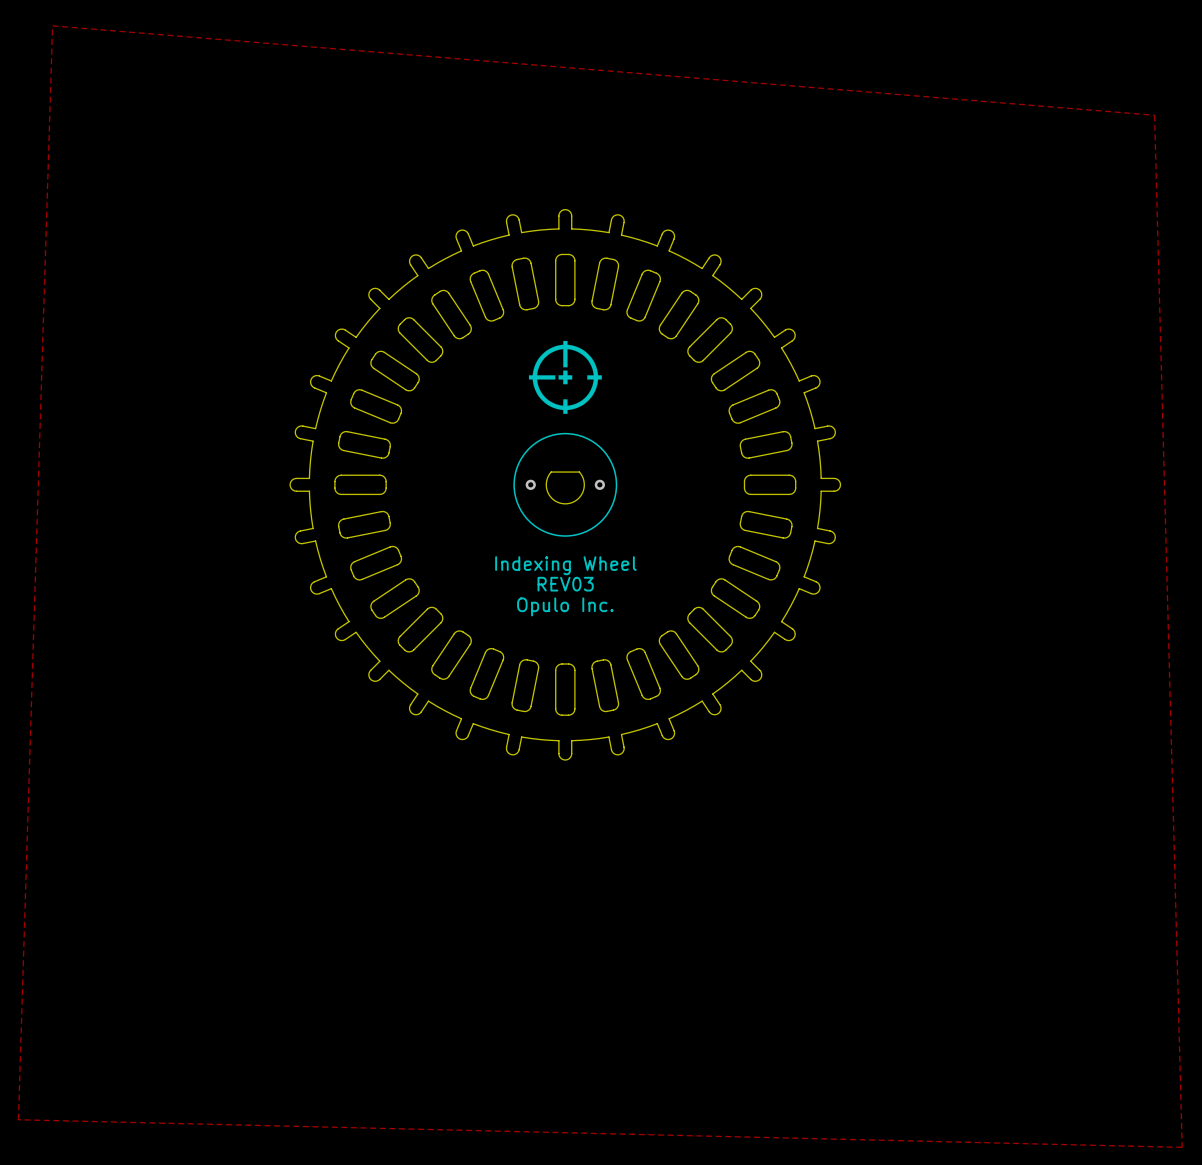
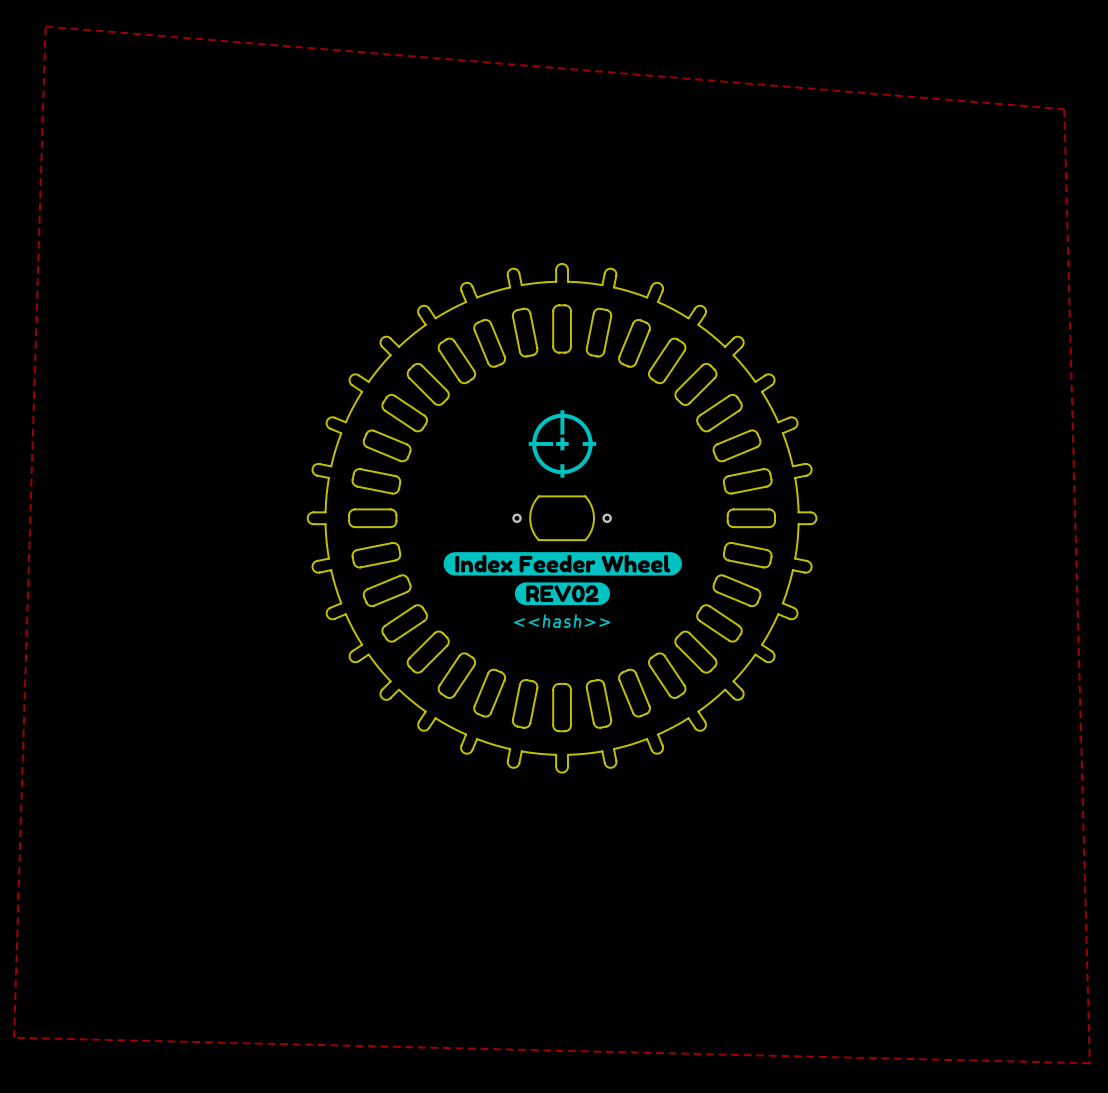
board edge: (562, 254) (570, 254) (574, 260) (574, 299) (569, 305) (559, 305) (555, 300) (555, 260) (557, 256) (562, 254) -> (559, 305) (567, 305) (570, 310) (570, 347) (565, 352) (556, 352) (553, 347) (553, 310) (559, 305)
board edge: (523, 258) (514, 260) (512, 266) (519, 305) (526, 309) (536, 307) (538, 301) (530, 262) (527, 258) (523, 258) -> (523, 308) (515, 311) (512, 316) (520, 352) (526, 356) (535, 354) (537, 348) (530, 312) (523, 308)
board edge: (613, 259) (617, 261) (618, 266) (610, 304) -> none
board edge: (613, 259) (604, 258) (600, 261) (591, 301) (594, 307) (603, 309) (608, 308) (610, 304) -> none
board edge: (480, 270) (471, 274) (470, 280) (485, 317) (493, 320) (502, 316) (503, 310) (488, 273) (485, 270) (480, 270) -> (483, 320) (475, 324) (474, 329) (488, 363) (495, 366) (503, 362) (504, 357) (490, 323) (483, 320)
board edge: (650, 270) (658, 274) (660, 280) (644, 317) (637, 320) (628, 316) (627, 310) (642, 273) (646, 270) (650, 270) -> (640, 320) (648, 324) (649, 329) (635, 363) (628, 366) (620, 362) (619, 357) (633, 323) (640, 320)
board edge: (439, 291) (444, 290) (448, 292) (470, 325) (470, 332) (462, 337) (454, 336) (432, 303) (432, 296) (439, 291) -> (446, 339) (454, 340) (474, 371) (474, 377) (467, 382) (459, 381) (439, 350) (439, 344) (446, 339)
board edge: (690, 291) (697, 296) (698, 303) (675, 336) (668, 337) (660, 332) (660, 325) (682, 292) (686, 290) (690, 291) -> (677, 339) (684, 344) (684, 350) (664, 381) (657, 382) (649, 377) (649, 371) (670, 340) (677, 339)
board edge: (370, 299) (379, 308) (356, 337) (343, 329) (336, 332) (337, 339) (348, 347) (331, 380) (317, 375) (311, 379) (312, 386) (326, 392) (315, 428) (301, 426) (295, 431) (298, 438) (313, 441) (309, 478) (294, 478) (290, 484) (294, 491) (309, 491) (313, 528) (298, 531) (295, 538) (301, 543) (315, 541) (326, 576) (313, 582) (311, 590) (317, 594) (331, 588) (349, 621) (337, 629) (336, 637) (343, 640) (356, 632) (379, 661) (369, 671) (369, 678) (374, 681) (379, 679) -> none
board edge: (370, 299) (368, 293) (372, 289) (378, 289) (388, 299) (417, 275) (409, 262) (413, 255) (420, 256) (428, 268) (461, 250) (456, 236) (460, 230) (467, 232) (473, 245) (509, 235) (506, 220) (511, 214) (518, 217) (521, 232) (558, 228) (559, 213) (565, 209) (571, 213) (571, 228) (608, 232) (612, 218) (618, 214) (624, 220) (621, 235) (657, 245) (663, 232) (670, 230) (674, 236) (669, 250) (702, 268) (710, 256) (718, 256) (720, 263) (712, 275) (741, 299) (752, 289) (759, 290) (760, 297) (750, 308) (774, 337) (787, 329) (794, 331) (793, 339) (781, 347) (799, 380) (813, 375) (819, 379) (817, 386) (804, 392) (815, 428) (829, 426) (835, 431) (831, 438) (817, 441) (821, 478) (835, 478) (840, 484) (835, 491) (821, 491) (817, 528) (831, 531) (835, 538) (829, 543) (815, 541) (804, 576) (817, 582) (819, 590) (812, 594) (799, 588) (781, 621) (793, 630) (794, 637) (787, 640) (774, 632) (750, 661) (760, 671) (759, 679) (752, 680) (741, 670) (712, 694) (720, 706) (718, 713) (710, 713) (702, 701) (669, 718) (674, 732) (670, 739) (663, 737) (657, 723) (621, 734) (624, 749) (618, 754) (612, 751) (608, 737) (571, 740) (571, 755) (565, 759) (559, 755) (558, 740) (521, 737) (518, 751) (511, 754) (506, 748) (509, 734) (473, 723) (467, 737) (460, 739) (456, 732) (461, 718) (428, 701) (420, 713) (413, 714) (409, 706) (417, 694) (388, 670) (379, 679) -> none
board edge: none -> (521, 285) (556, 281) (556, 267) (562, 263) (567, 267) (567, 281) (602, 285) (605, 272) (611, 268) (616, 274) (614, 287) (647, 297) (652, 285) (659, 283) (663, 289) (658, 302) (688, 318) (696, 306) (703, 306) (705, 313) (698, 324) (725, 346) (735, 337) (742, 338) (742, 345) (733, 355) (755, 381) (766, 374) (773, 376) (773, 384) (762, 391) (778, 422) (790, 417) (797, 420) (795, 427) (782, 433) (792, 466) (806, 463) (811, 468) (808, 475) (795, 477) (798, 512) (812, 512) (816, 518) (812, 523) (798, 524) (795, 558) (808, 561) (811, 567) (806, 572) (792, 570) (782, 603) (793, 607)
board edge: none -> (521, 285) (518, 272) (512, 268) (507, 274) (510, 287) (477, 297) (471, 284) (464, 283) (461, 288) (466, 302) (435, 318) (427, 307) (420, 306) (418, 313) (425, 324) (398, 346) (389, 337) (382, 338) (381, 345) (390, 355) (368, 381) (356, 374) (350, 376) (350, 383) (362, 391) (345, 422) (332, 417) (326, 421) (329, 427) (341, 433) (331, 466) (318, 463) (312, 468) (315, 475) (328, 477) (325, 512) (311, 512) (307, 518) (311, 523) (325, 524) (328, 558) (315, 561) (312, 567) (317, 572) (331, 570) (341, 603) (328, 608) (327, 615) (333, 619) (345, 614) (362, 644) (351, 652) (350, 658) (356, 662) (368, 654) (390, 681) (381, 690) (381, 696) (385, 699) (390, 698)
board edge: (404, 319) (398, 326) (399, 332) (427, 360) (435, 360) (442, 354) (441, 347) (413, 319) (409, 317) (404, 319) -> (413, 365) (408, 371) (408, 377) (435, 403) (442, 403) (448, 397) (447, 391) (421, 365) (413, 365)
board edge: (716, 319) (688, 348) (688, 354) (696, 361) (702, 360) (731, 331) (731, 325) (725, 319) (721, 317) (716, 319) -> (702, 365) (676, 391) (676, 397) (682, 404) (689, 403) (715, 376) (715, 371) (709, 365) (702, 365)
board edge: none -> (600, 308) (608, 311) (611, 316) (604, 352) (597, 356) (589, 354) (586, 348) (593, 312) (600, 308)
board edge: (384, 352) (417, 375) (418, 380) (413, 389) (406, 390) (372, 366) (371, 361) (376, 353) (379, 351) (384, 352) -> (394, 395) (425, 416) (426, 421) (421, 429) (415, 430) (383, 409) (382, 404) (387, 396) (394, 395)
board edge: (746, 352) (712, 375) (711, 381) (717, 389) (724, 390) (758, 366) (759, 361) (754, 353) (751, 351) (746, 352) -> (729, 395) (698, 416) (697, 422) (702, 430) (709, 430) (740, 409) (741, 404) (737, 396) (729, 395)
drawing position: (565, 377) -> (562, 443)
board edge: (362, 390) (399, 406) (401, 411) (397, 421) (390, 422) (352, 406) (350, 401) (354, 393) (357, 390) (362, 390) -> (374, 430) (408, 445) (410, 450) (406, 459) (400, 461) (365, 446) (363, 441) (366, 433) (374, 430)
board edge: (768, 390) (731, 406) (729, 411) (733, 421) (739, 422) (777, 406) (779, 401) (776, 393) (773, 390) (768, 390) -> (749, 430) (715, 445) (713, 450) (717, 459) (723, 461) (758, 446) (760, 441) (757, 433) (749, 430)
board edge: (783, 431) (743, 439) (740, 445) (742, 455) (748, 458) (788, 449) (791, 445) (790, 436) (787, 432) (783, 431) -> none
drawing: [513, 432, 618, 537] -> none
board edge: (339, 436) (342, 433) (346, 431) (385, 439) (390, 443) (388, 453) (382, 458) (343, 450) (338, 445) (339, 436) -> none
board edge: (551, 472) (579, 472) (584, 485) (578, 498) (565, 503) (552, 498) (546, 485) (551, 472) -> none
board edge: (341, 475) (381, 475) (385, 479) (385, 489) (380, 494) (339, 494) (335, 490) (334, 480) (336, 477) (341, 475) -> (355, 509) (392, 509) (396, 513) (396, 522) (391, 527) (353, 526) (349, 523) (349, 514) (355, 509)
board edge: (750, 475) (790, 475) (795, 479) (795, 489) (790, 494) (748, 494) (744, 490) (744, 480) (746, 477) (750, 475) -> (733, 509) (770, 509) (774, 513) (774, 522) (769, 527) (731, 526) (728, 523) (727, 514) (733, 509)
via: (530, 484) -> none
via: (599, 484) -> none
board edge: none -> (360, 469) (397, 476) (400, 481) (398, 490) (392, 493) (355, 485) (352, 481) (353, 473) (360, 469)
board edge: (381, 511) (341, 519) (338, 525) (340, 534) (346, 538) (387, 529) (390, 525) (388, 515) (386, 512) (381, 511) -> (392, 543) (355, 550) (352, 555) (354, 564) (360, 567) (397, 559) (400, 555) (398, 547) (392, 543)
board edge: none -> (723, 483) (726, 491) (731, 493) (767, 486) (771, 480) (769, 471) (764, 469) (727, 476) (723, 483)
board edge: (745, 530) (785, 538) (790, 534) (791, 524) (787, 519) (747, 511) (742, 514) (740, 523) (741, 527) (745, 530) -> none
board edge: none -> (538, 496) (585, 496) (591, 506) (594, 518) (591, 530) (585, 540) (538, 540) (532, 530) (530, 518) (532, 506) (538, 496)
board edge: (390, 546) (354, 561) (352, 562) (350, 568) (354, 577) (361, 579) (399, 563) (401, 558) (398, 549) (394, 546) (392, 546) (390, 546) (390, 546) -> (400, 575) (367, 589) (365, 590) (363, 595) (367, 604) (373, 605) (408, 591) (410, 586) (407, 578) (404, 575) (402, 575) (401, 575) (400, 575) (400, 575)
board edge: (740, 546) (777, 562) (779, 568) (775, 577) (769, 579) (731, 563) (729, 558) (732, 549) (736, 546) (740, 546) -> (723, 575) (758, 590) (760, 595) (756, 604) (750, 605) (715, 591) (713, 586) (716, 578) (723, 575)
via: none -> (516, 518)
via: none -> (607, 518)
text: Indexing Wheel (565, 565) -> none
board edge: (724, 579) (758, 602) (759, 608) (753, 616) (746, 617) (712, 594) (711, 588) (716, 581) (720, 578) (724, 579) -> (709, 606) (740, 627) (741, 632) (736, 640) (729, 641) (698, 619) (697, 614) (701, 607) (709, 606)
text: REV03 (565, 584) -> none
board edge: none -> (732, 543) (768, 550) (771, 555) (769, 564) (764, 567) (726, 559) (723, 555) (725, 547) (732, 543)
drawing: none -> [443, 552, 682, 606]
text: Opulo Inc. (565, 606) -> none
board edge: (371, 610) (370, 606) (373, 601) (406, 579) (412, 579) (418, 587) (416, 595) (383, 617) (377, 617) (371, 610) -> none
board edge: (463, 632) (470, 637) (470, 643) (448, 676) (440, 678) (432, 672) (432, 666) (454, 633) (459, 630) (463, 632) -> (467, 654) (474, 659) (474, 665) (454, 695) (446, 697) (439, 692) (439, 686) (459, 655) (467, 654)
board edge: (667, 632) (660, 637) (660, 643) (682, 676) (690, 678) (697, 672) (698, 666) (675, 633) (672, 631) (667, 632) -> (656, 654) (649, 659) (649, 665) (670, 695) (677, 697) (684, 692) (684, 686) (664, 655) (656, 654)
board edge: (730, 636) (732, 640) (731, 644) (724, 651) (718, 651) (689, 622) (688, 615) (695, 608) (701, 608) (730, 636) -> none
board edge: (413, 649) (409, 651) (405, 650) (398, 643) (398, 638) (427, 608) (434, 608) (441, 615) (441, 621) (413, 649) -> none
board edge: (493, 649) (502, 653) (503, 659) (488, 696) (480, 699) (471, 694) (470, 688) (485, 651) (489, 648) (493, 649) -> (495, 670) (503, 673) (504, 679) (490, 713) (483, 716) (475, 712) (474, 706) (488, 672) (495, 670)
board edge: (636, 649) (628, 653) (627, 659) (642, 696) (649, 699) (658, 694) (660, 688) (644, 651) (641, 648) (636, 649) -> (628, 670) (620, 673) (619, 679) (633, 713) (640, 716) (648, 712) (649, 706) (635, 672) (632, 670) (628, 670)
board edge: none -> (414, 606) (383, 627) (382, 632) (387, 640) (394, 641) (425, 619) (426, 614) (422, 607) (414, 606)
board edge: none -> (793, 607) (797, 611) (796, 616) (790, 619) (778, 614) (762, 644) (773, 652) (773, 660) (766, 661) (755, 654) (733, 681) (741, 689)
board edge: (527, 659) (536, 662) (538, 668) (530, 707) (524, 711) (514, 708) (512, 703) (519, 664) (522, 660) (527, 659) -> (526, 680) (535, 682) (537, 687) (530, 723) (524, 727) (515, 725) (512, 720) (520, 684) (526, 680)
board edge: (603, 659) (594, 662) (592, 668) (599, 707) (606, 711) (615, 708) (618, 703) (610, 664) (608, 660) (603, 659) -> (597, 680) (589, 682) (586, 687) (593, 723) (600, 727) (608, 725) (611, 720) (604, 684) (597, 680)
board edge: (562, 664) (570, 664) (574, 669) (574, 709) (569, 715) (559, 714) (555, 709) (555, 669) (558, 665) (562, 664) -> (559, 683) (567, 684) (570, 689) (570, 726) (565, 731) (556, 730) (553, 726) (553, 689) (559, 683)
text: none -> <<hash>> (562, 621)
board edge: none -> (434, 633) (442, 632) (448, 639) (447, 644) (421, 671) (414, 671) (408, 665) (408, 660) (434, 633)
board edge: none -> (677, 645) (676, 637) (683, 632) (688, 632) (715, 658) (715, 665) (709, 671) (703, 672) (677, 645)
board edge: none -> (741, 689) (743, 695) (740, 699) (734, 699) (725, 689) (698, 711) (705, 723) (702, 730) (696, 729) (688, 718) (658, 734) (663, 747) (659, 753) (652, 751) (647, 739) (614, 749) (616, 762) (611, 767) (605, 764) (602, 751) (567, 754) (567, 768) (562, 772) (556, 768) (556, 754) (521, 751) (518, 764) (513, 767) (507, 762) (510, 749) (477, 739) (472, 750)
board edge: none -> (390, 698) (399, 689) (425, 711) (418, 722) (420, 729) (427, 729) (435, 718) (466, 734) (461, 746) (462, 752) (468, 753) (472, 750)

